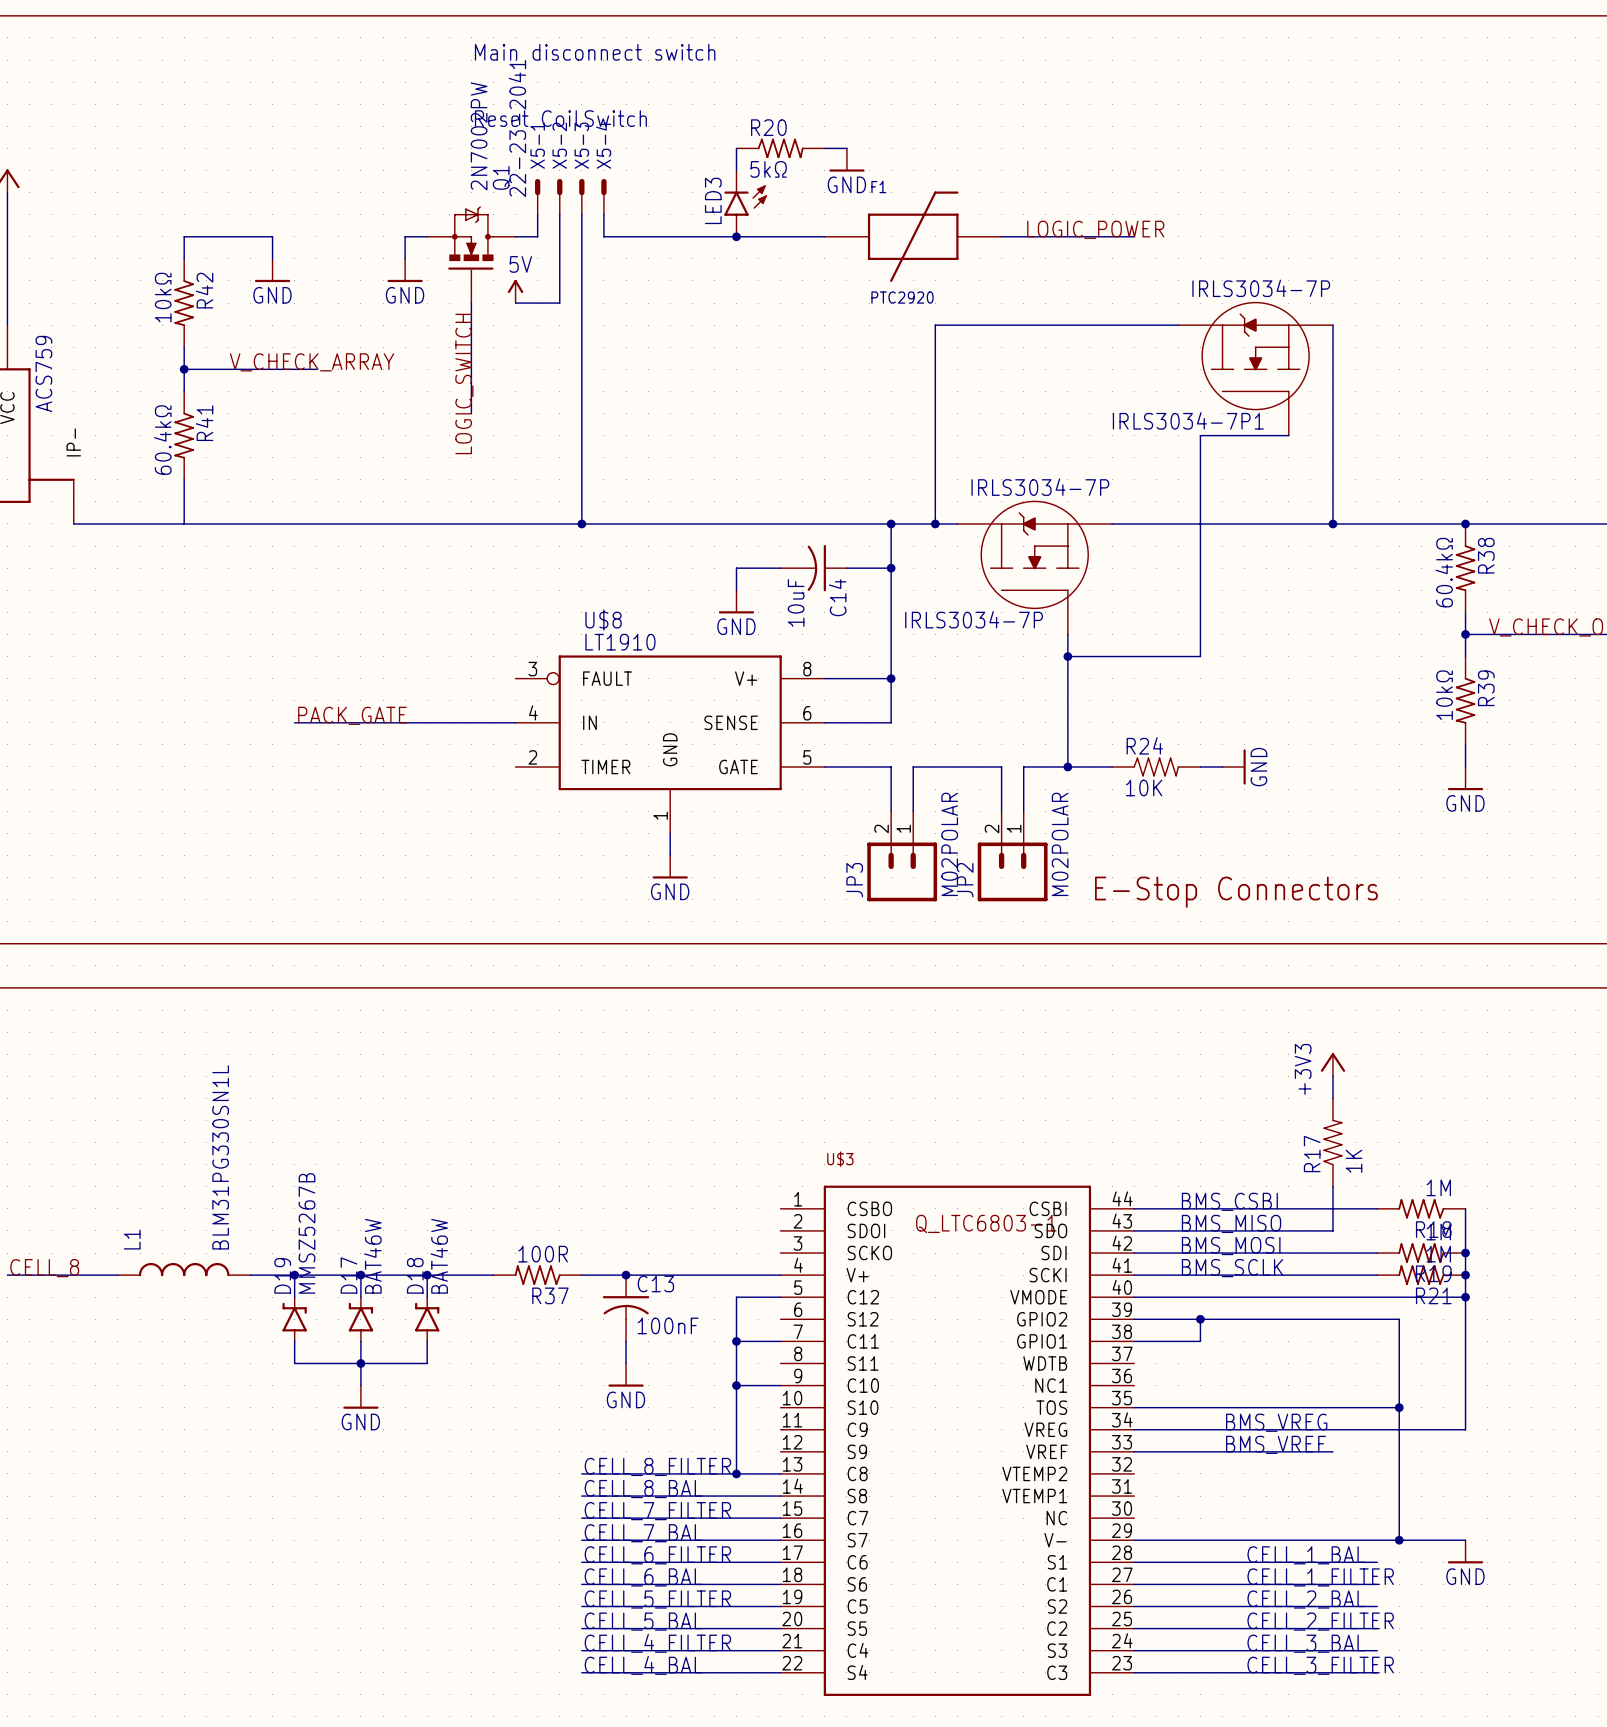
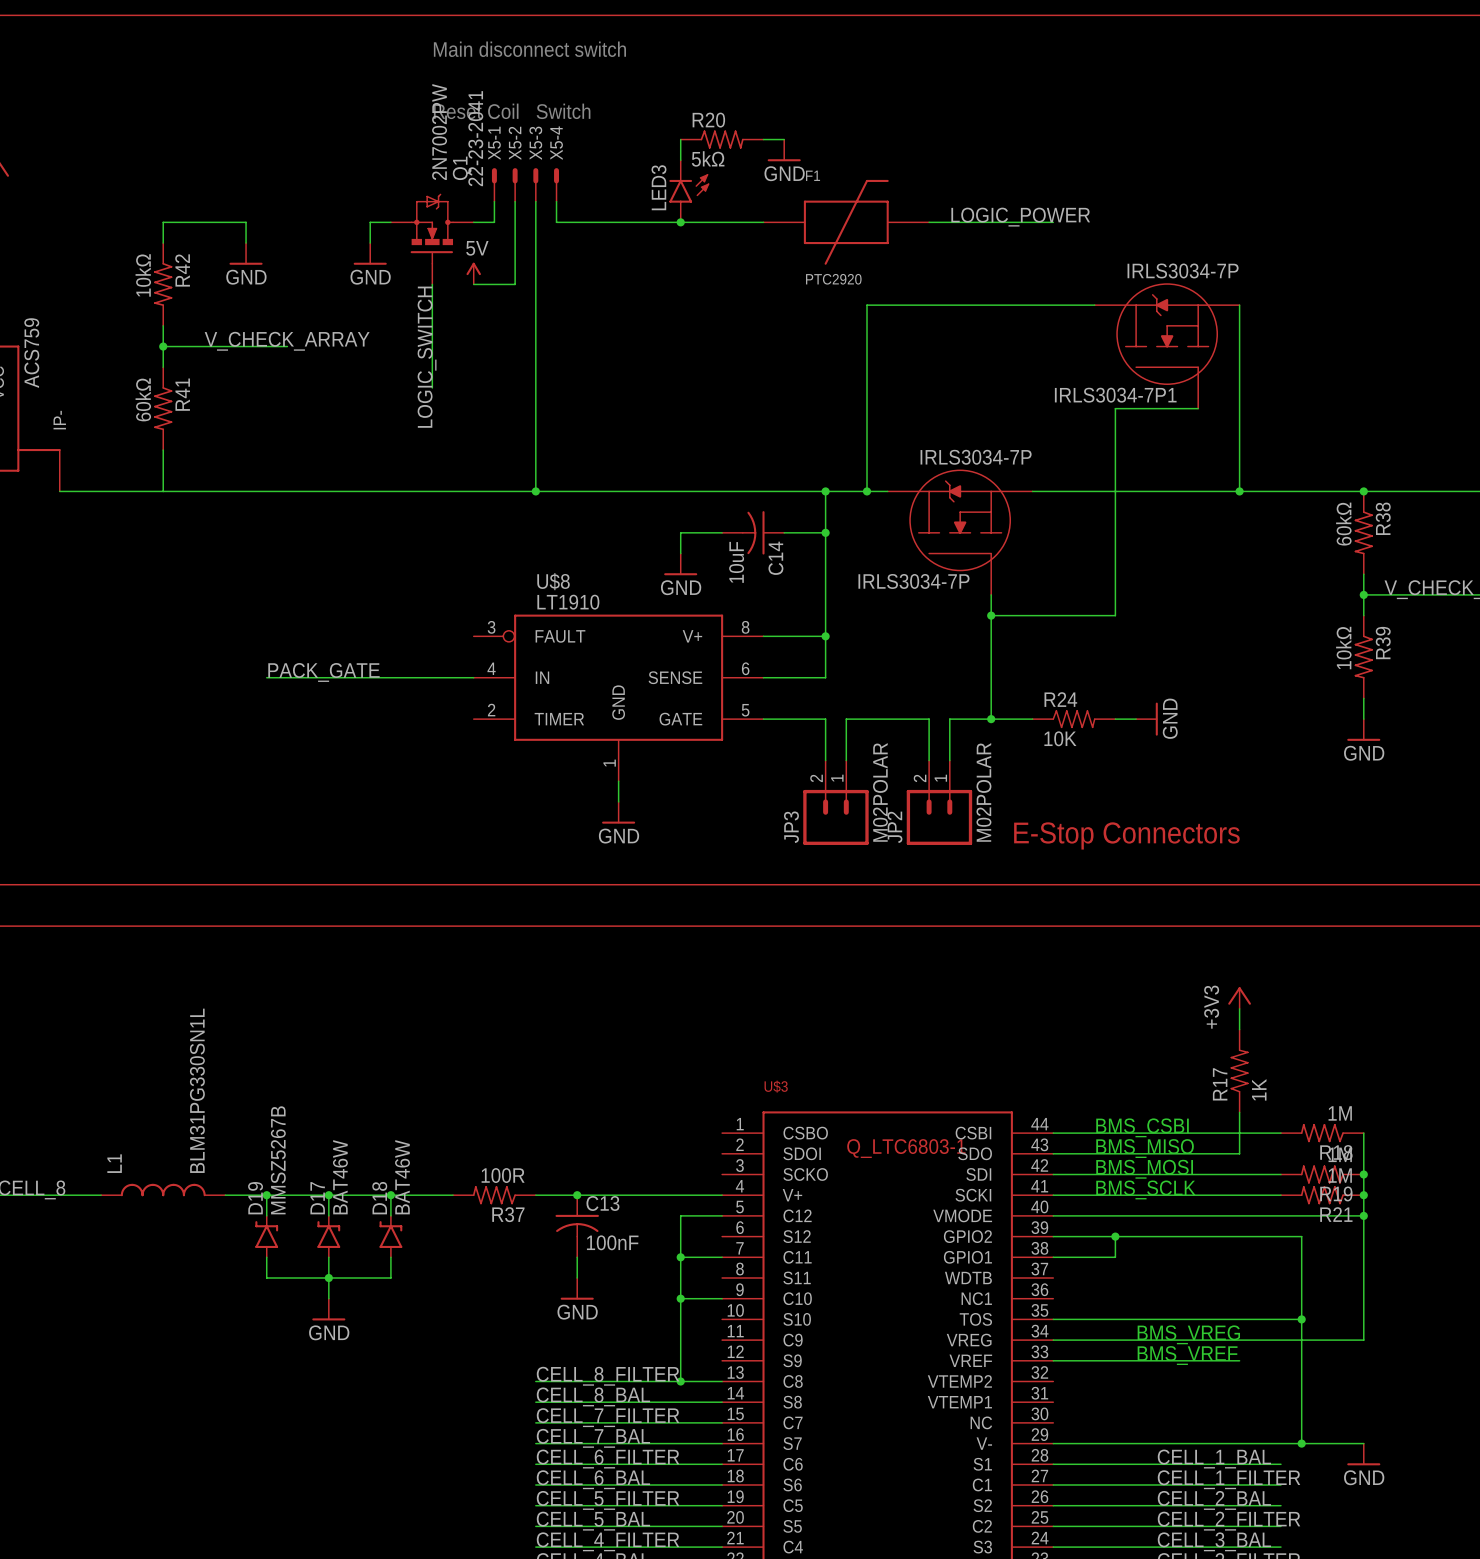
R41 value: 60.4kΩ (162, 440) -> 60kΩ (143, 399)
R38 value: 60.4kΩ (1444, 572) -> 60kΩ (1343, 524)

